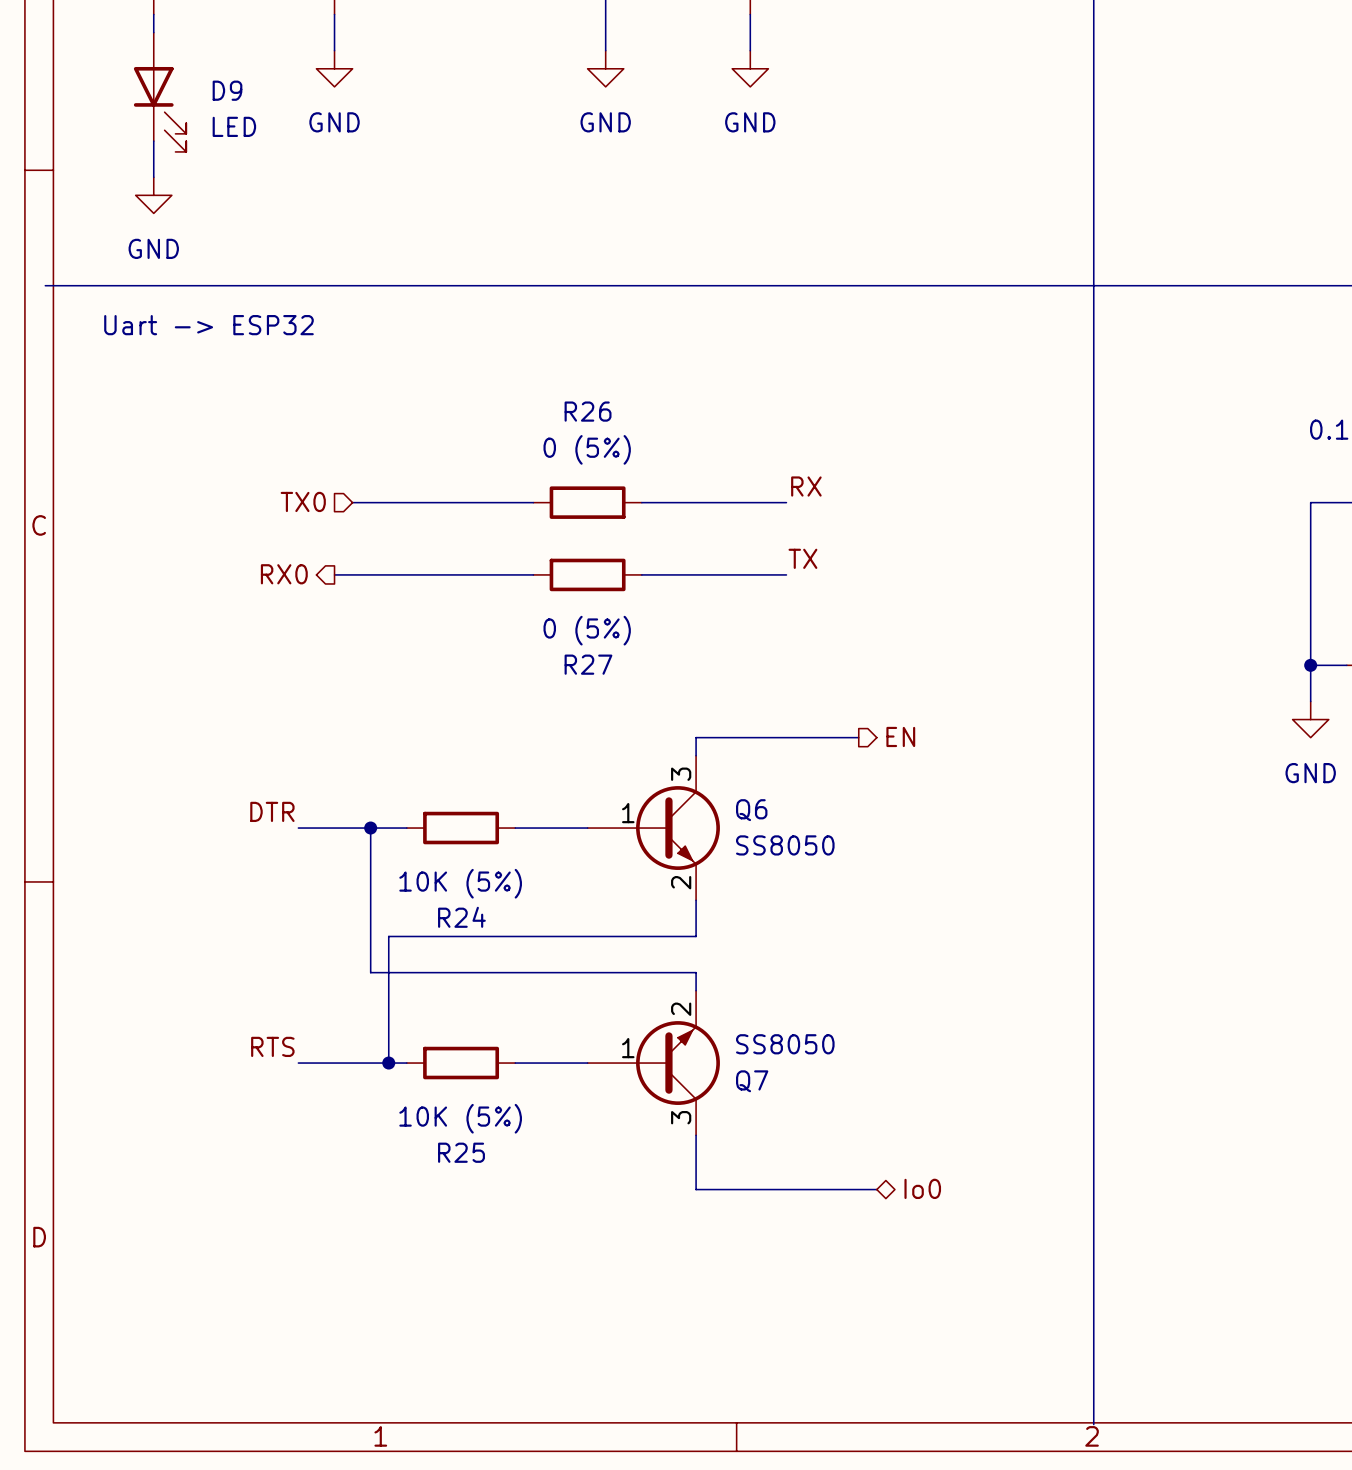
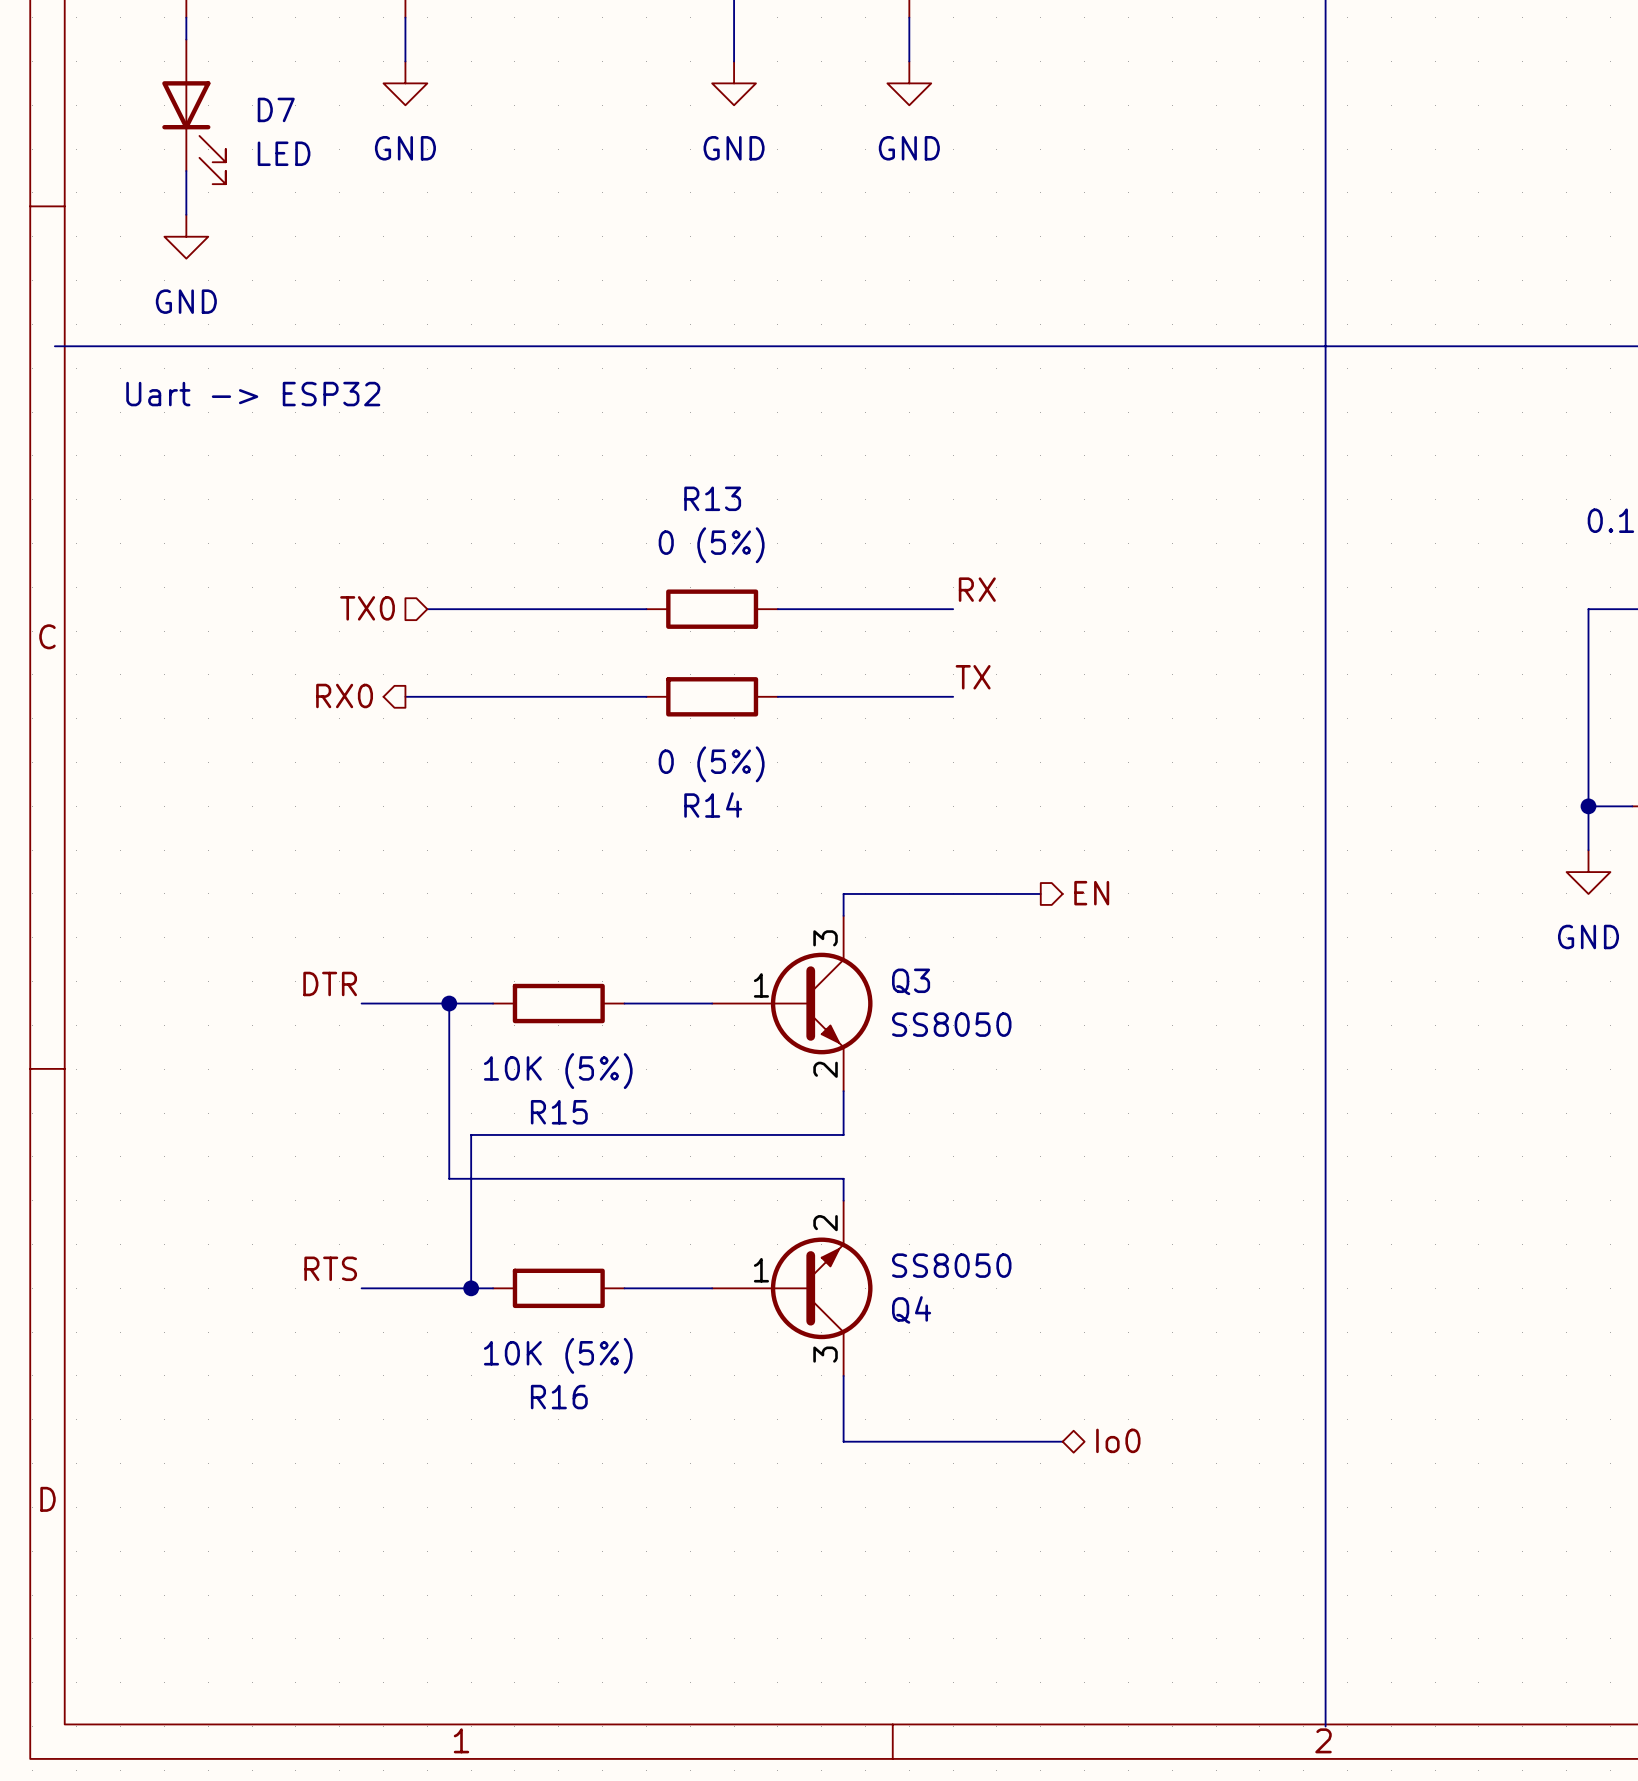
D9 name: D9 (227, 90) -> D7 (276, 109)
R26 name: R26 (588, 411) -> R13 (712, 498)
R27 name: R27 (588, 664) -> R14 (713, 805)
Q6 name: Q6 (751, 810) -> Q3 (911, 981)
R24 name: R24 (461, 917) -> R15 (559, 1112)
Q7 name: Q7 (752, 1081) -> Q4 (911, 1309)
R25 name: R25 (461, 1152) -> R16 (559, 1397)

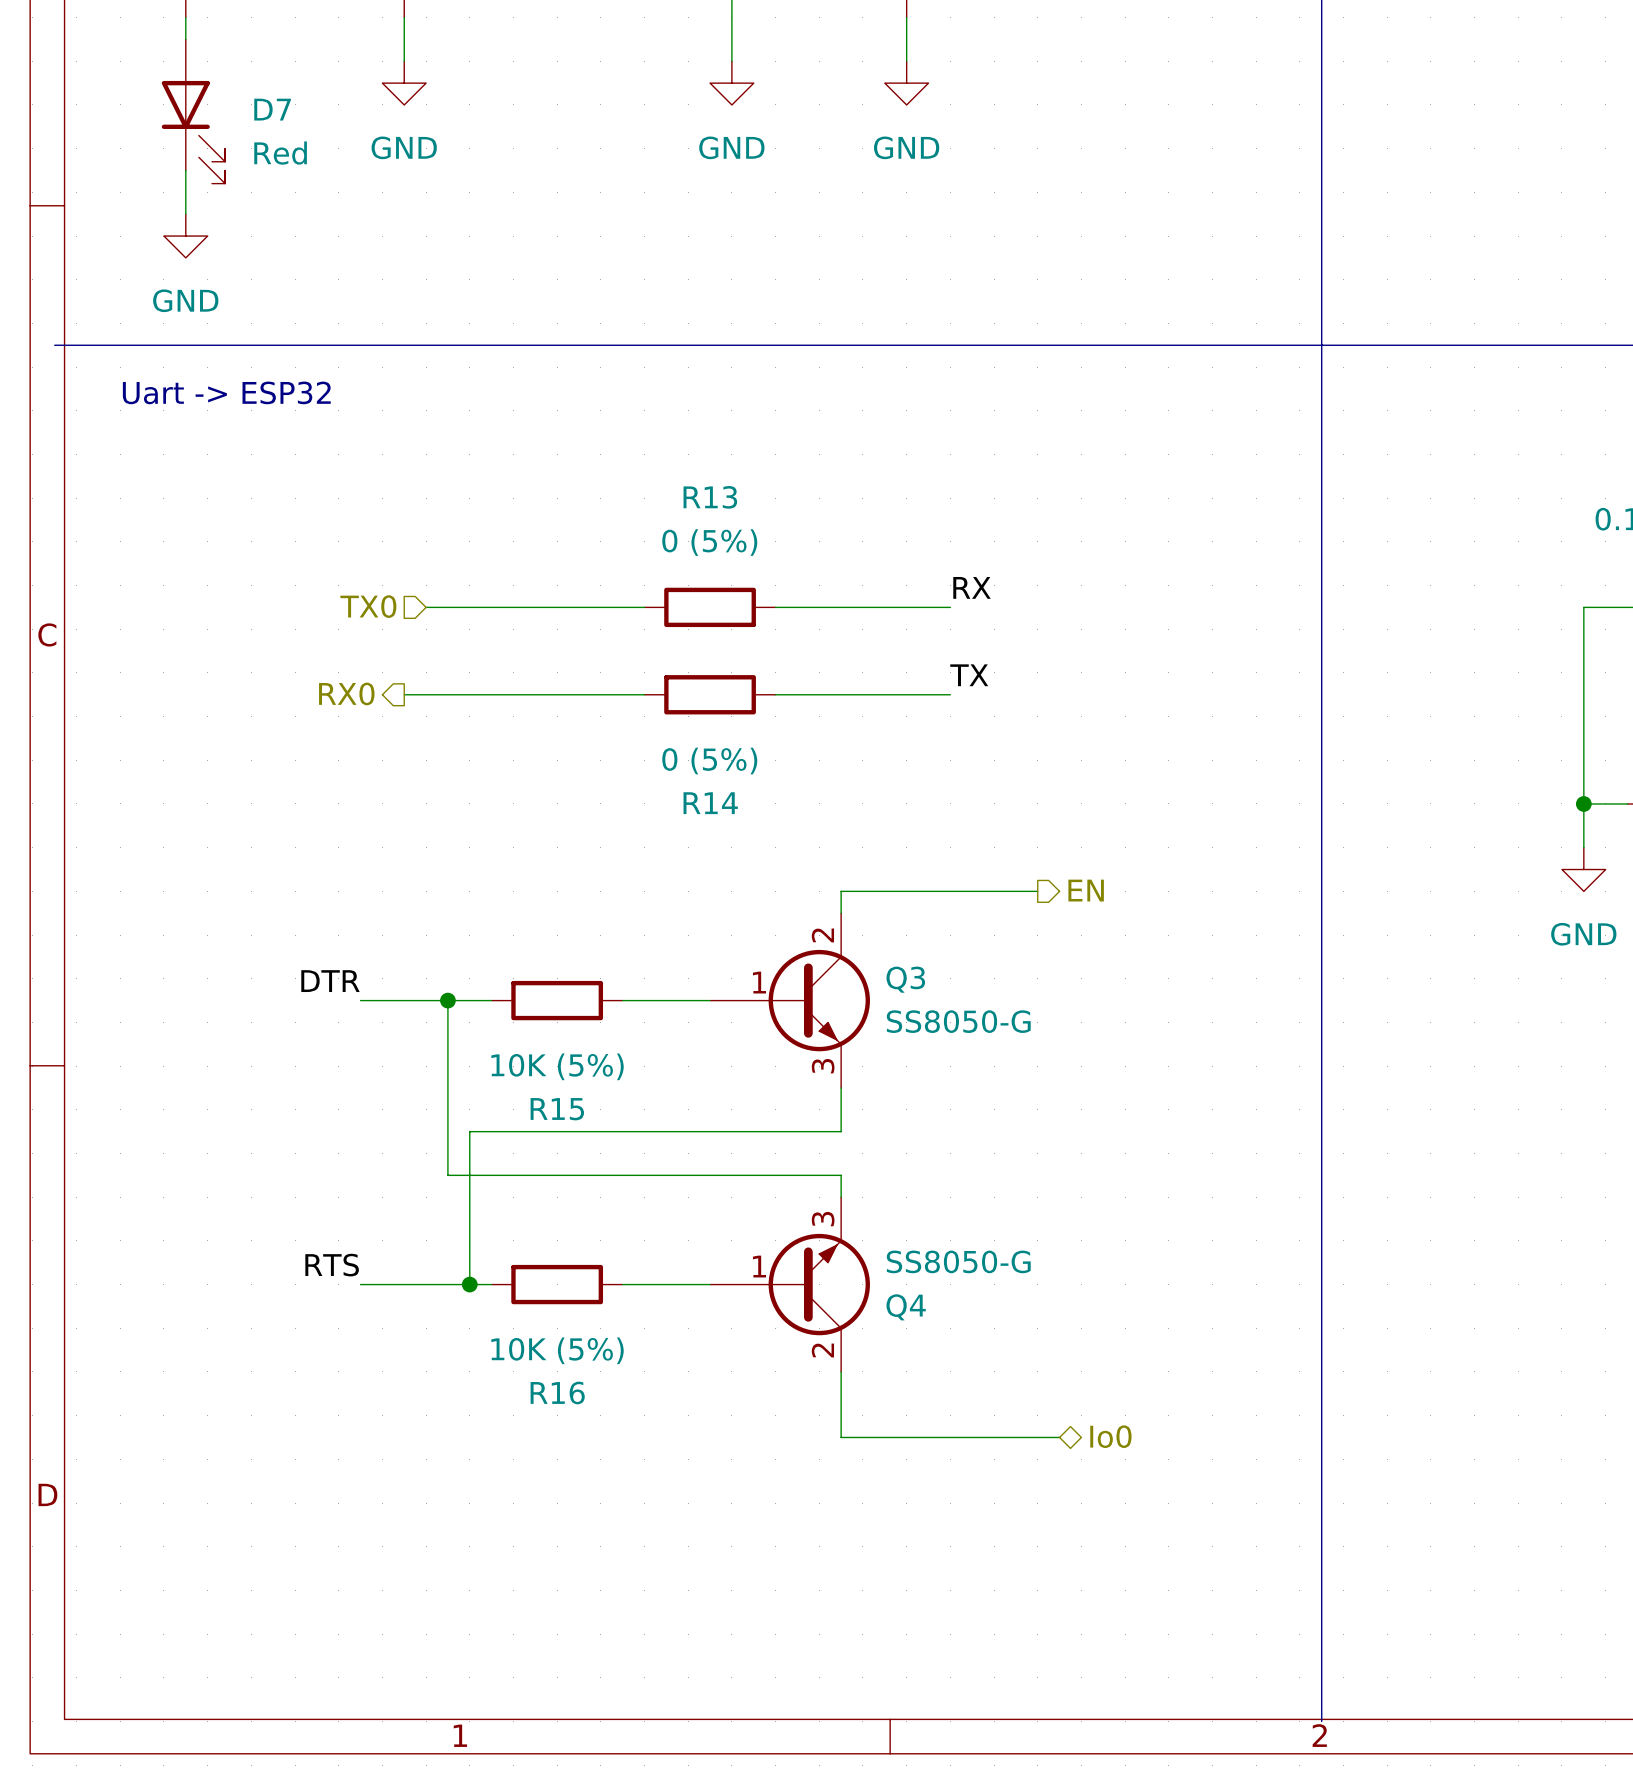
D7 value: LED (284, 153) -> Red (280, 153)
Q3 pin number: 3 (825, 938) -> 2 (822, 935)
Q3 value: SS8050 (951, 1024) -> SS8050-G (958, 1021)
Q3 pin number: 2 (825, 1069) -> 3 (823, 1066)
Q4 pin number: 2 (825, 1223) -> 3 (823, 1219)
Q4 value: SS8050 (951, 1265) -> SS8050-G (958, 1261)
Q4 pin number: 3 (825, 1354) -> 2 (822, 1350)

